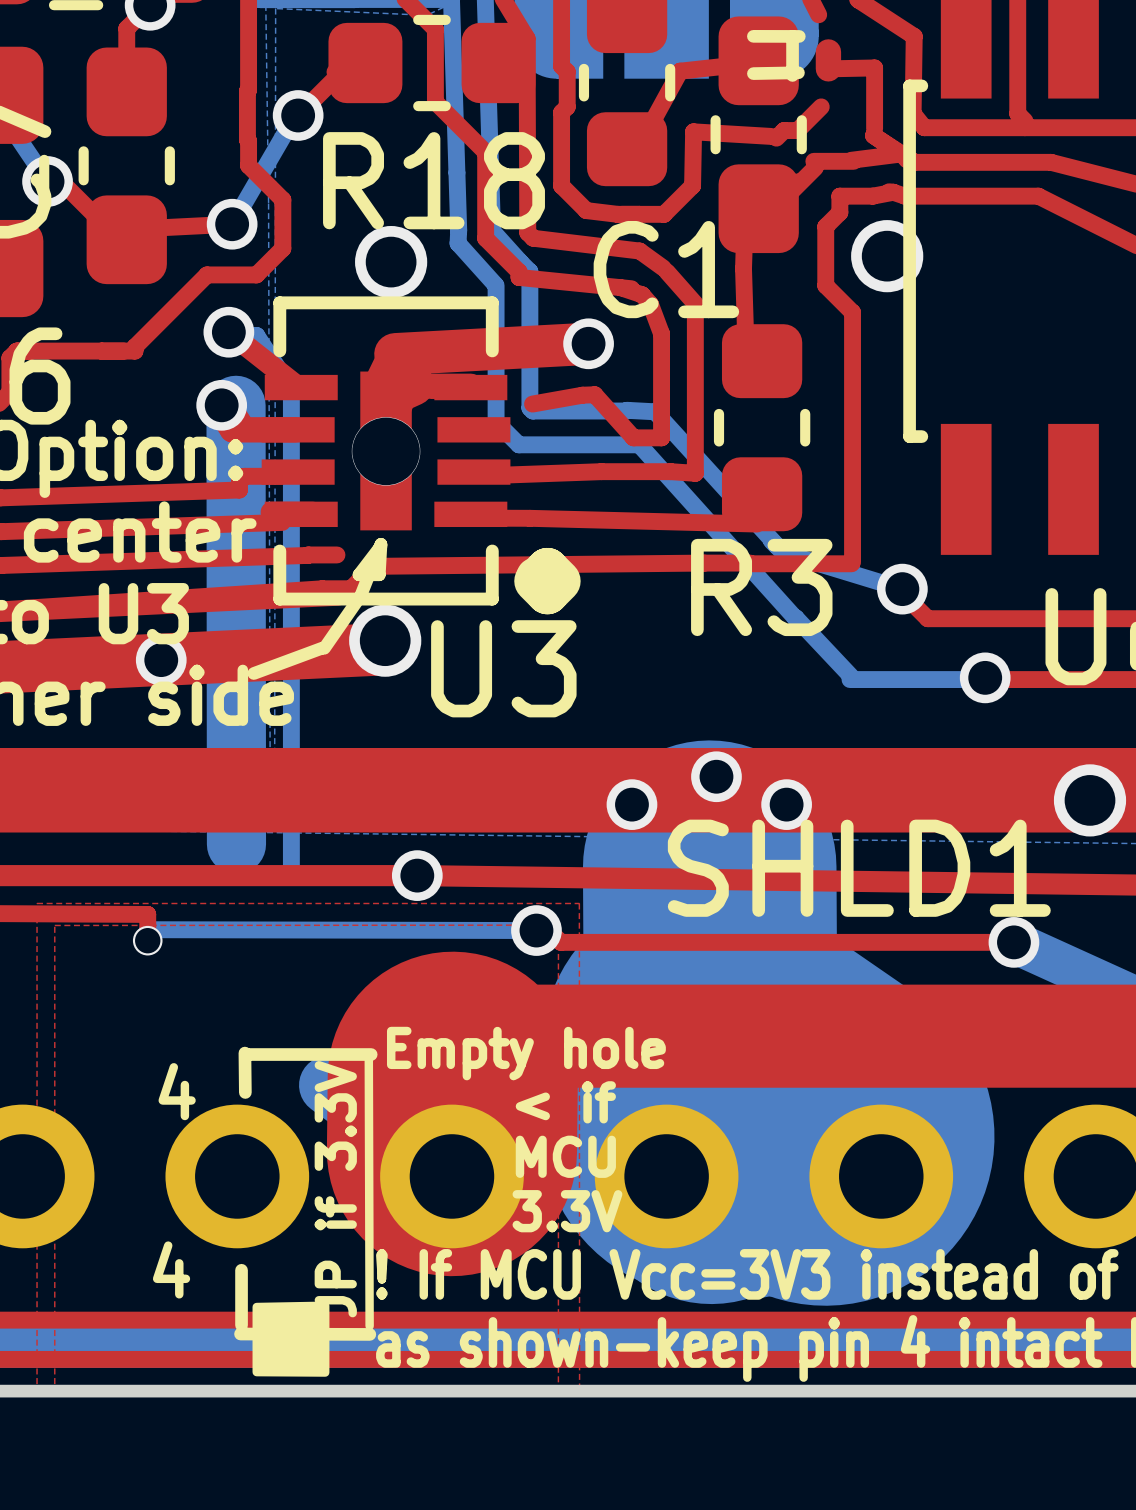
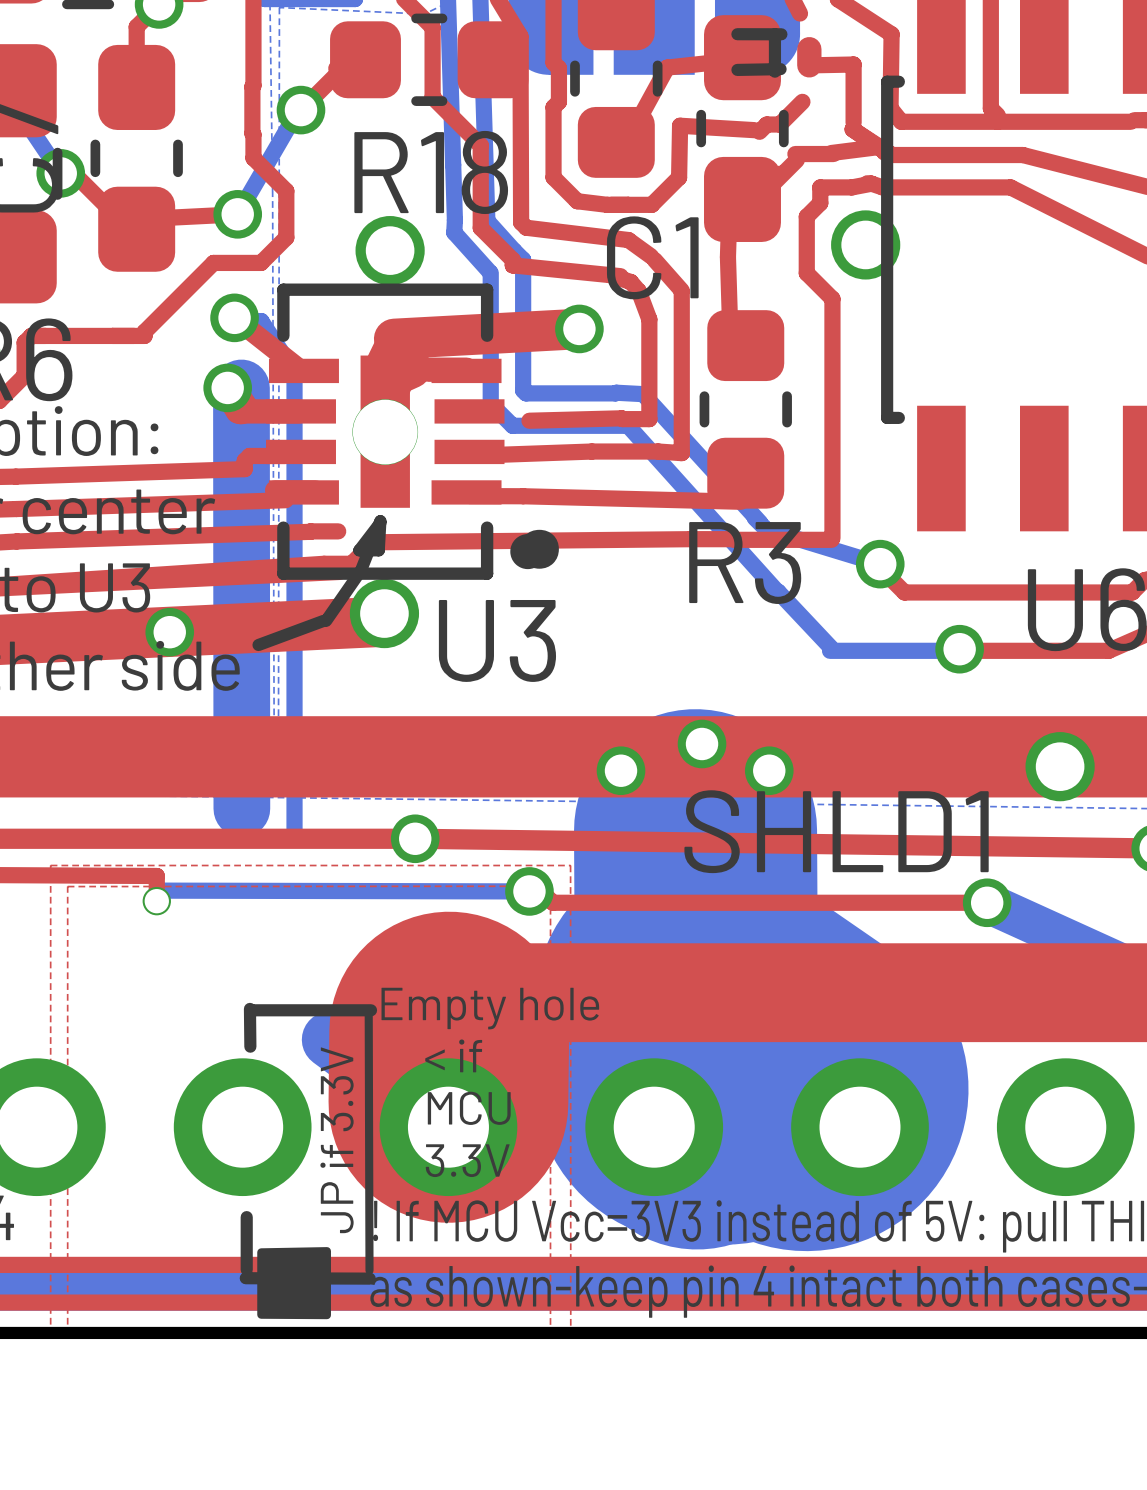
top track: (532, 404) (594, 394) (632, 437) -> (529, 420) (621, 418)

